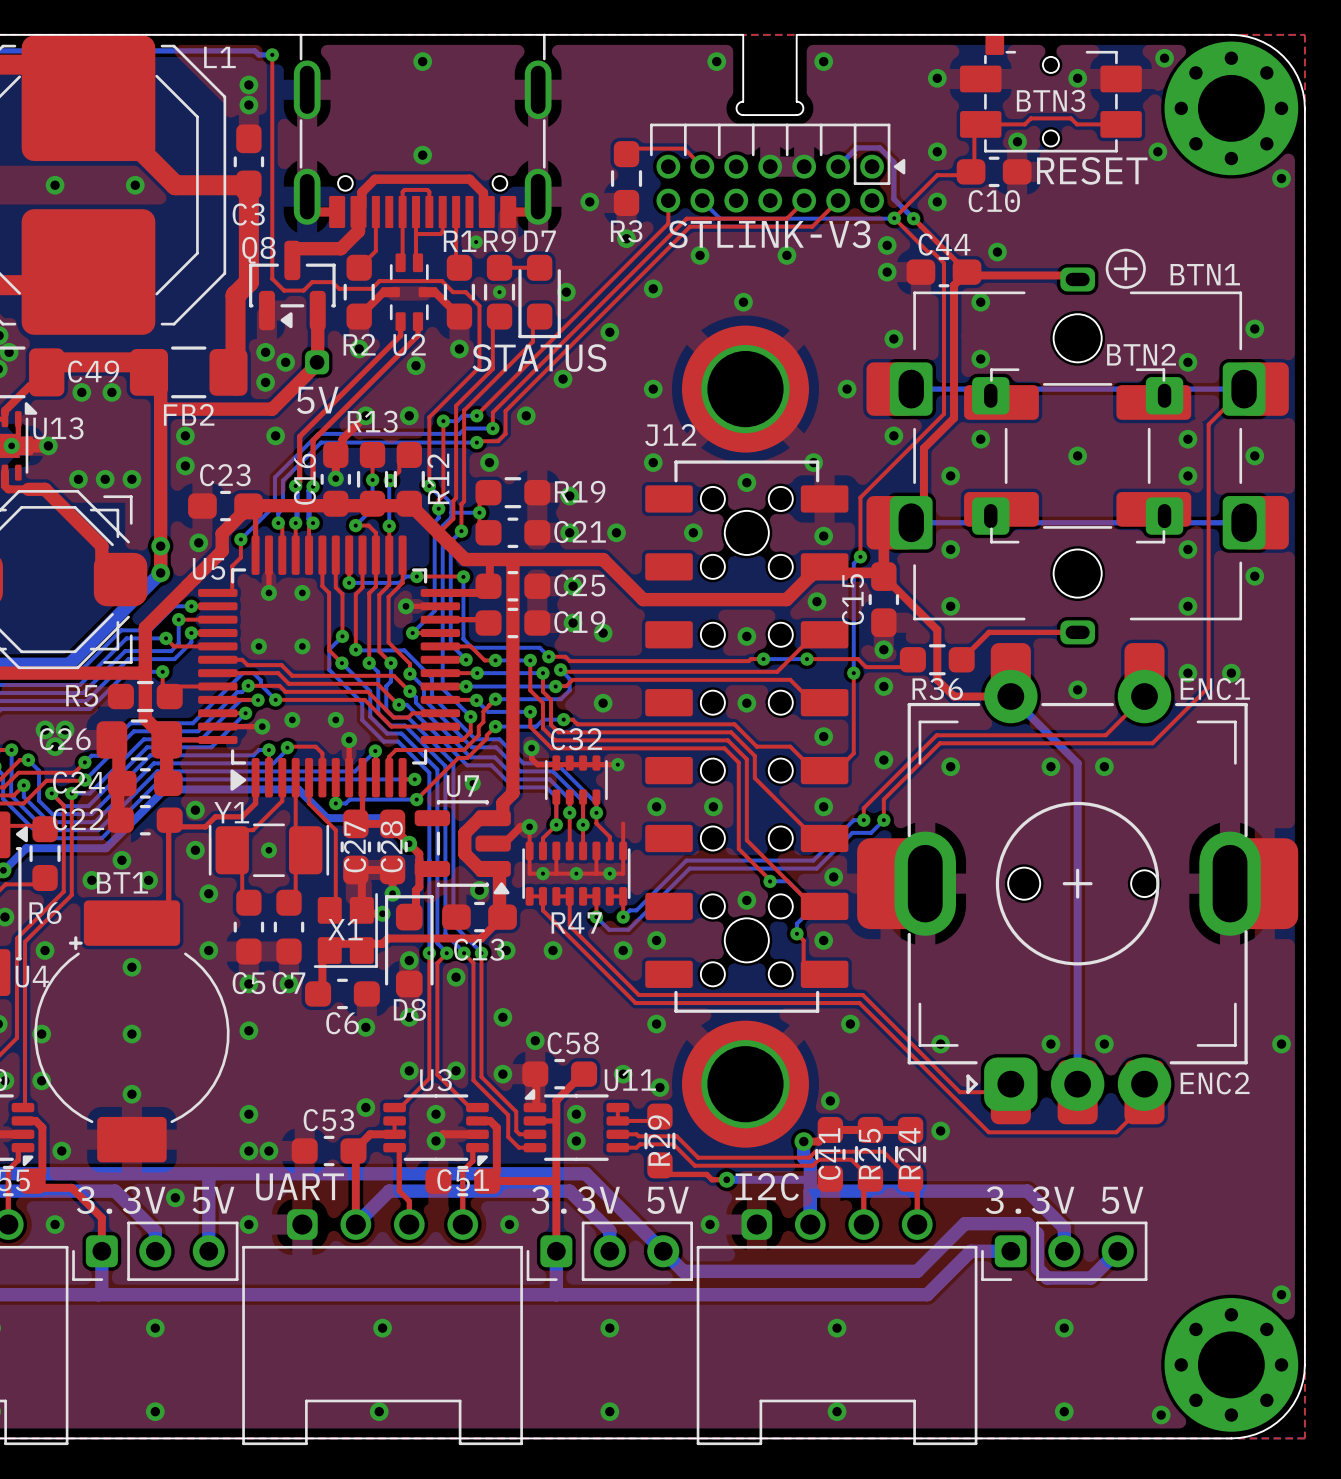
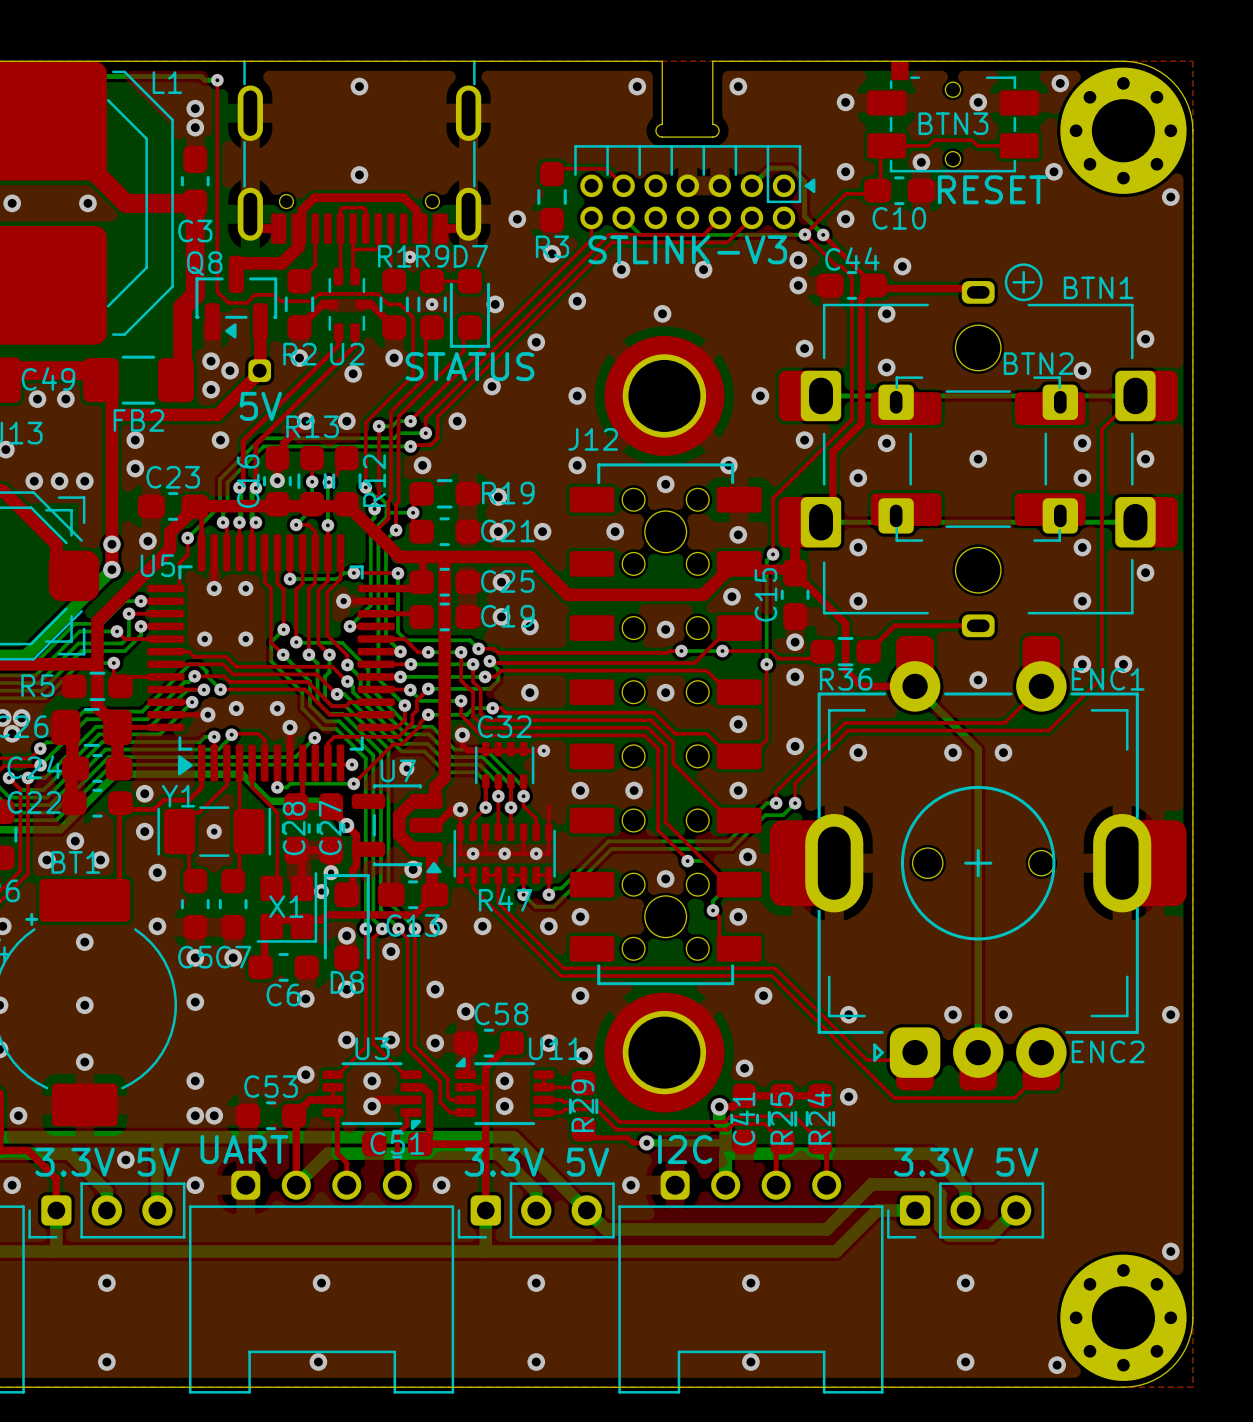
C27 name position: C27 (355, 846) -> C27 (330, 827)
C28 name position: C28 (391, 846) -> C28 (294, 828)

